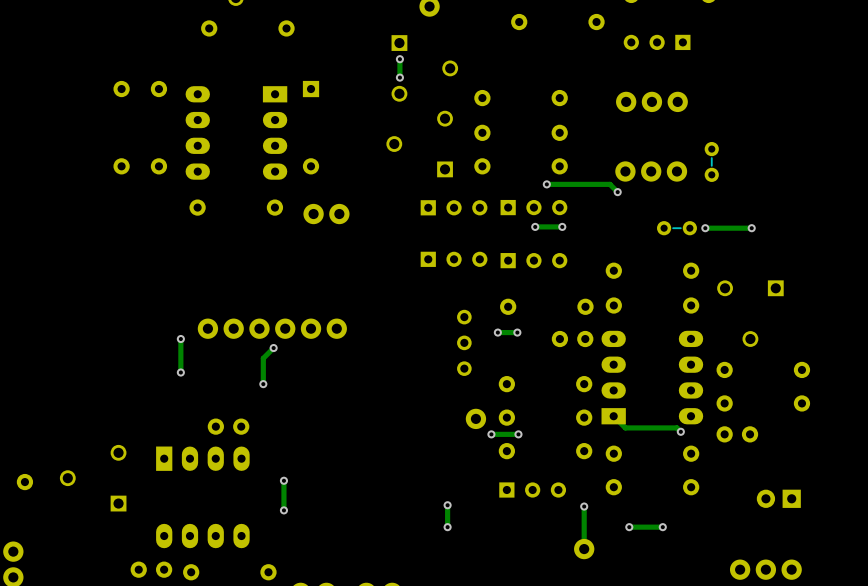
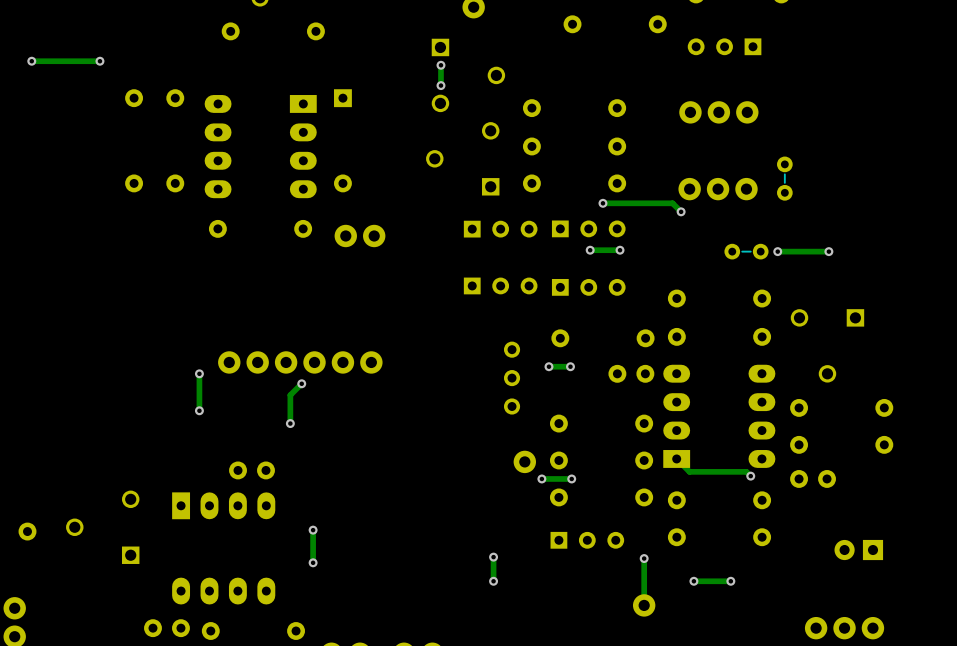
via: none -> (31, 61)
track: none -> (99, 61) (31, 61)
via: none -> (99, 61)

